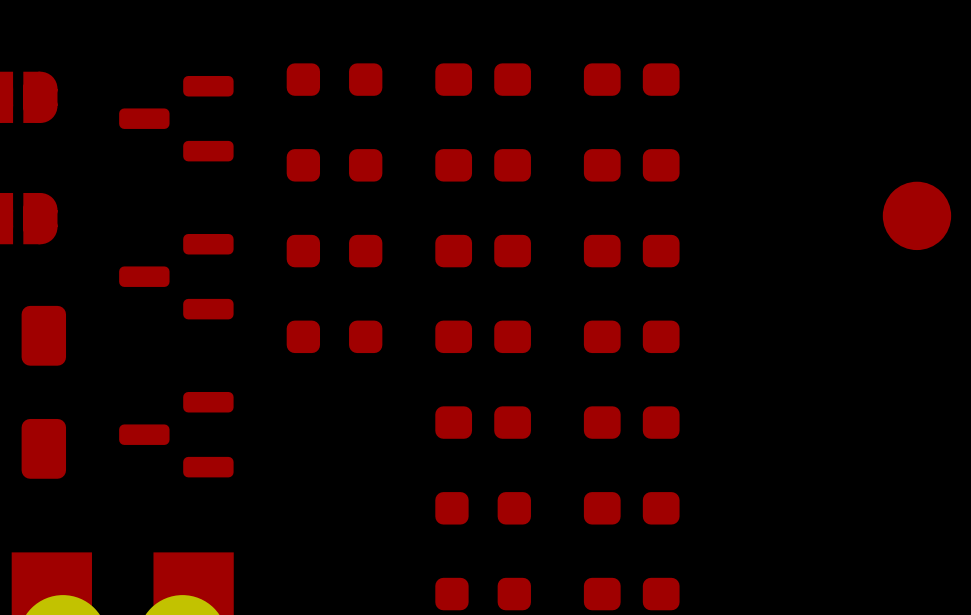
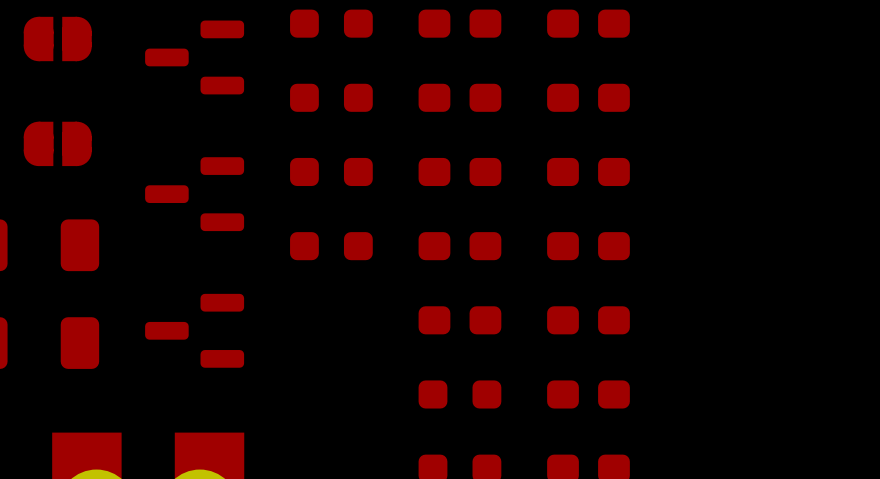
part: (916, 215) -> none

